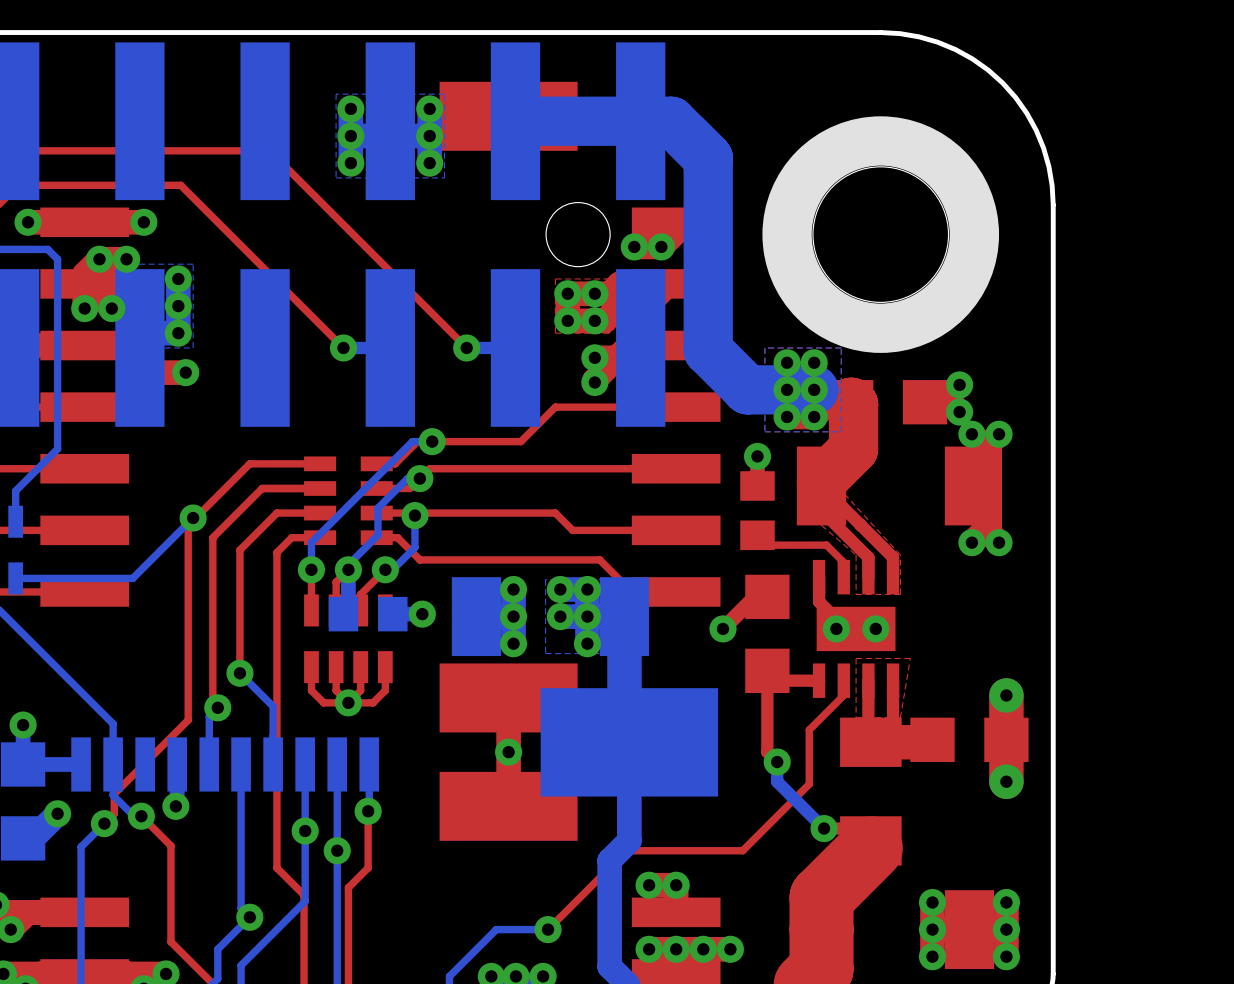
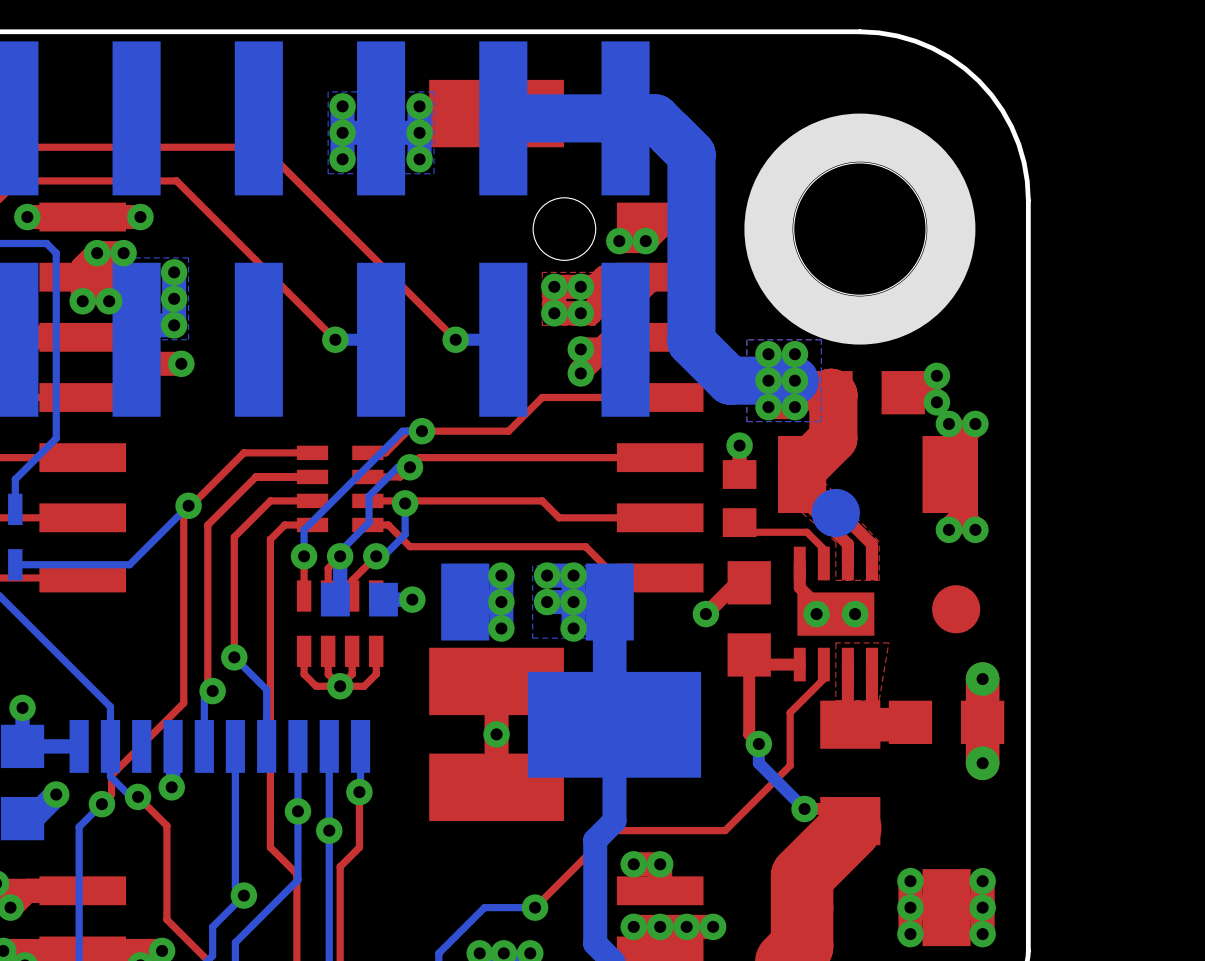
part: none -> (835, 513)
part: none -> (956, 609)

